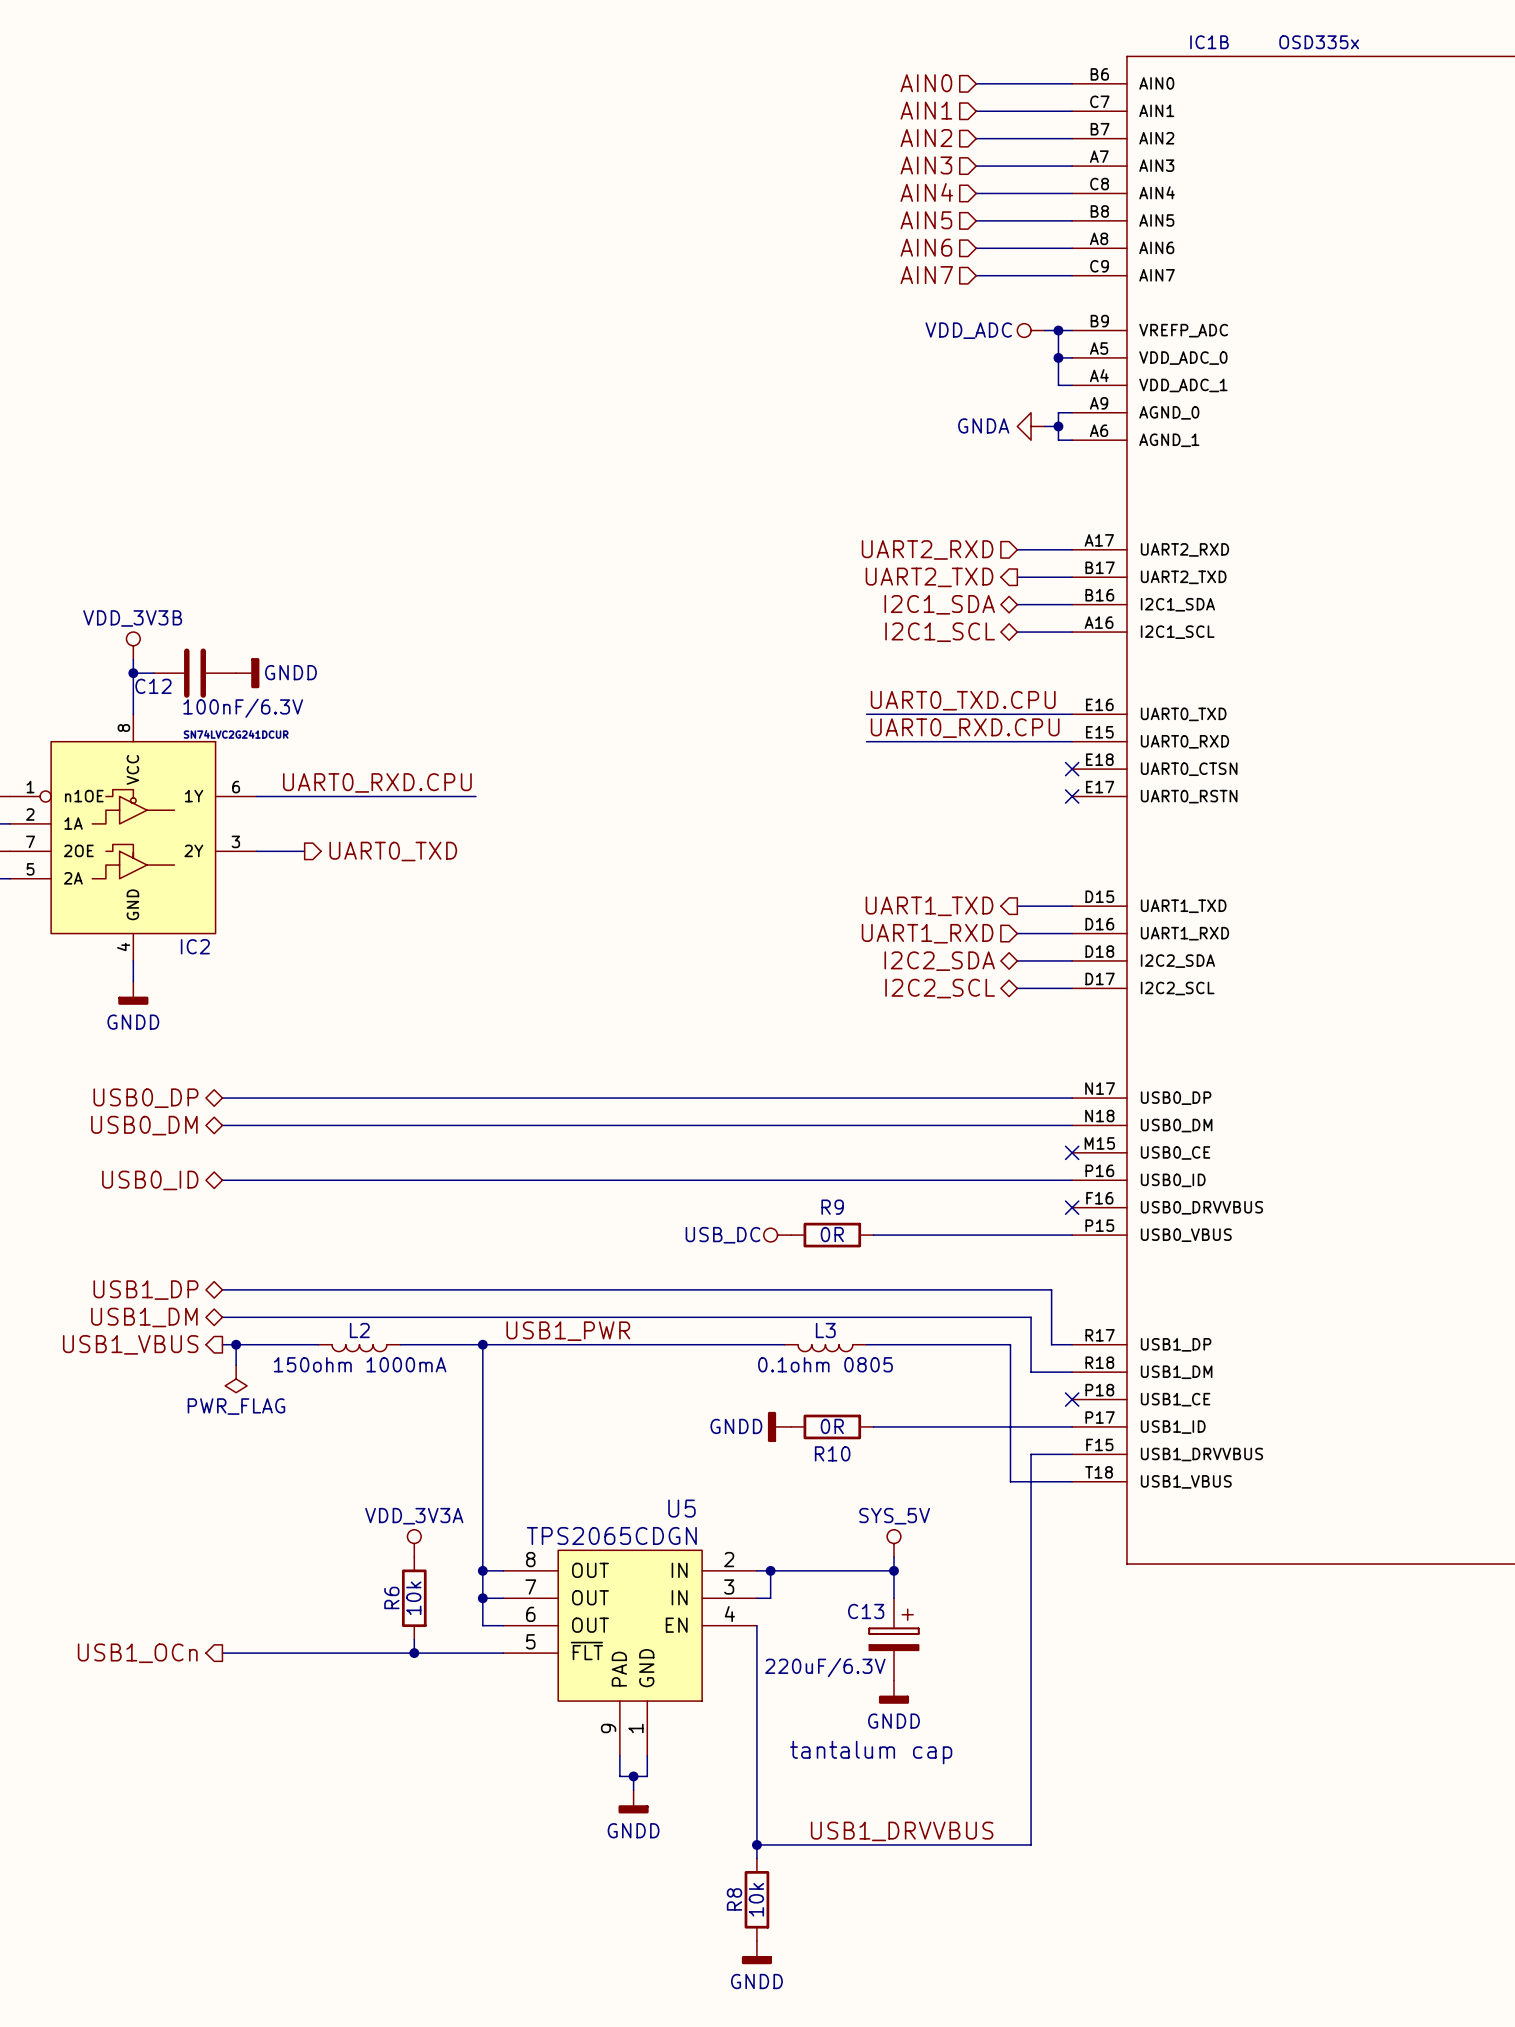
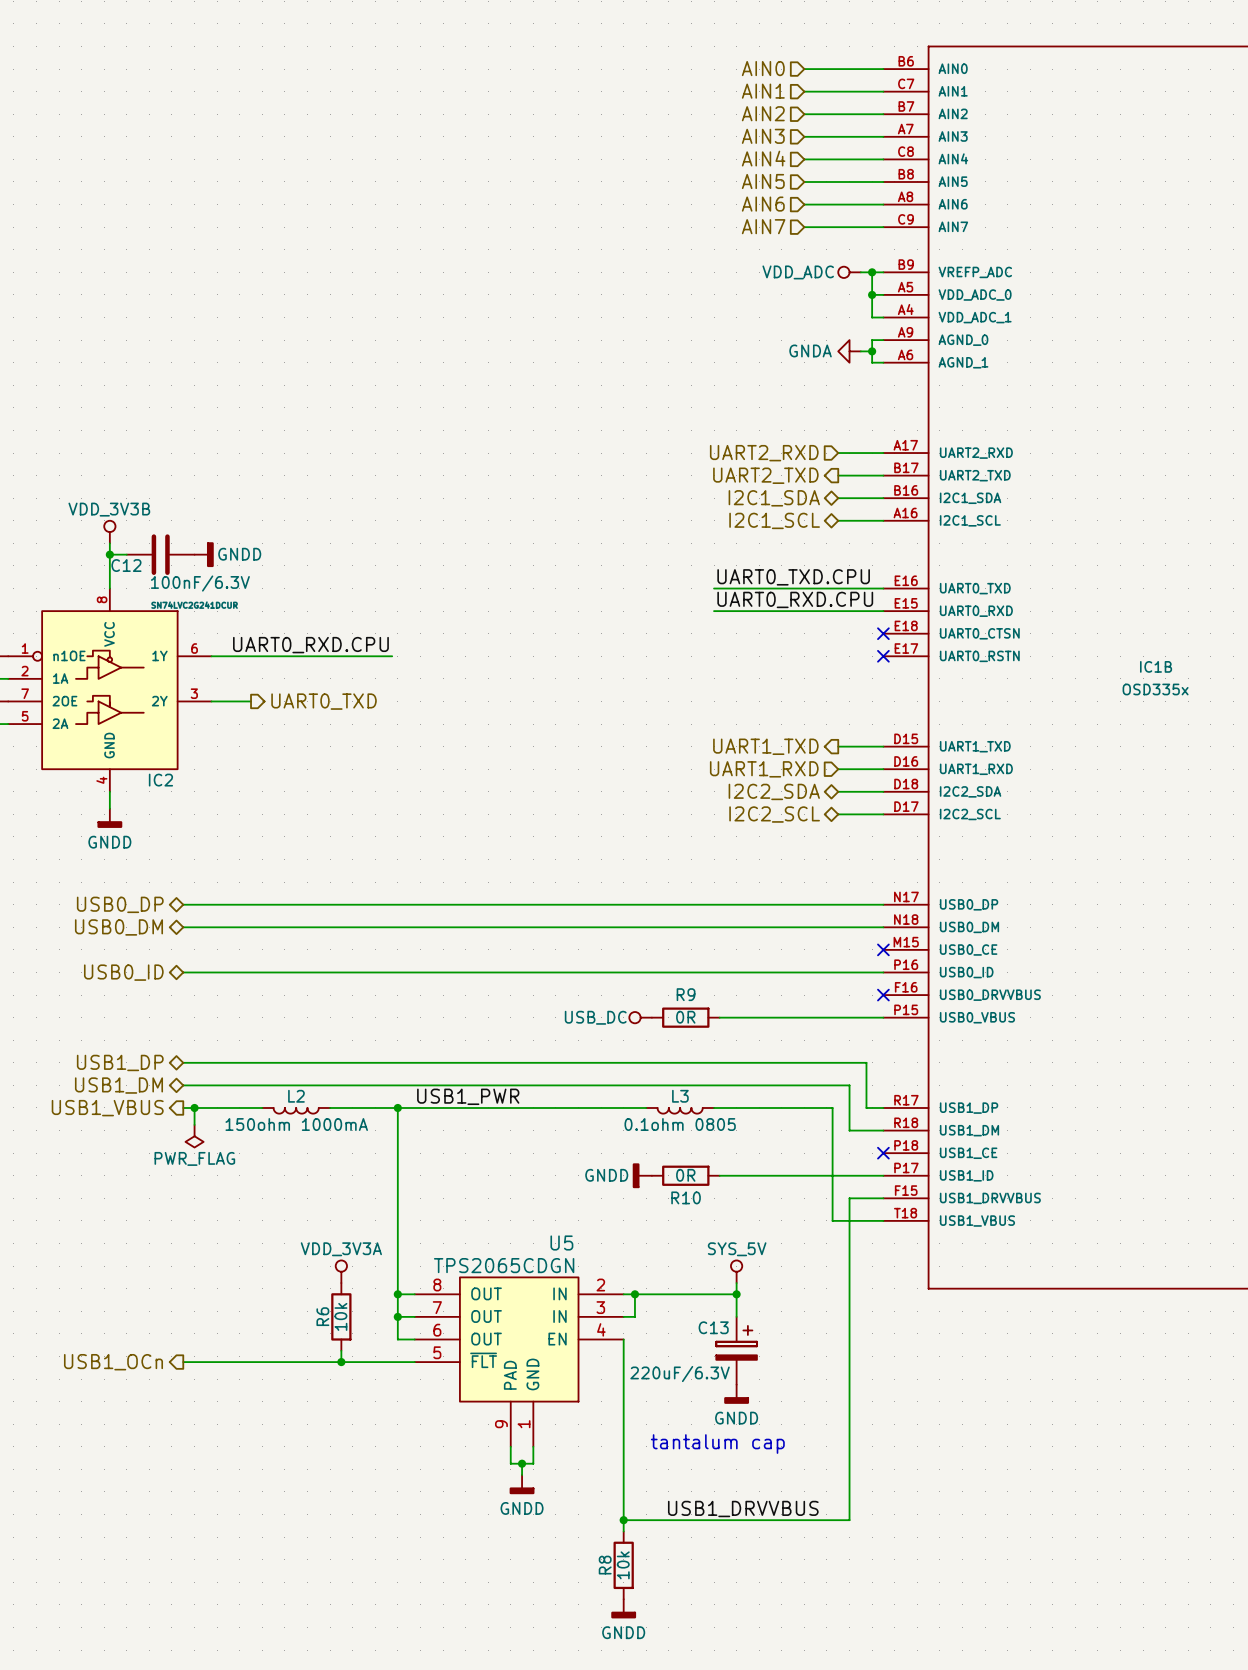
IC1B name position: IC1B (1209, 42) -> IC1B (1156, 666)
IC1B value position: OSD335x (1319, 42) -> OSD335x (1155, 689)

